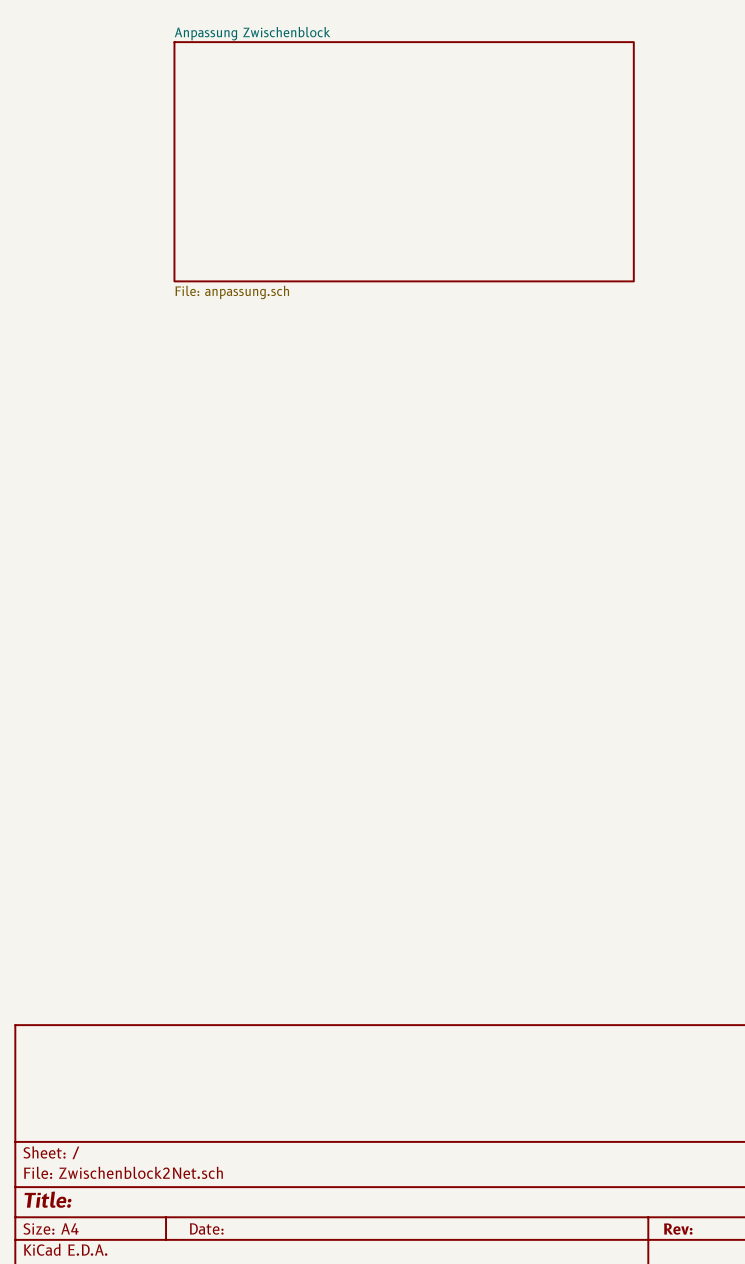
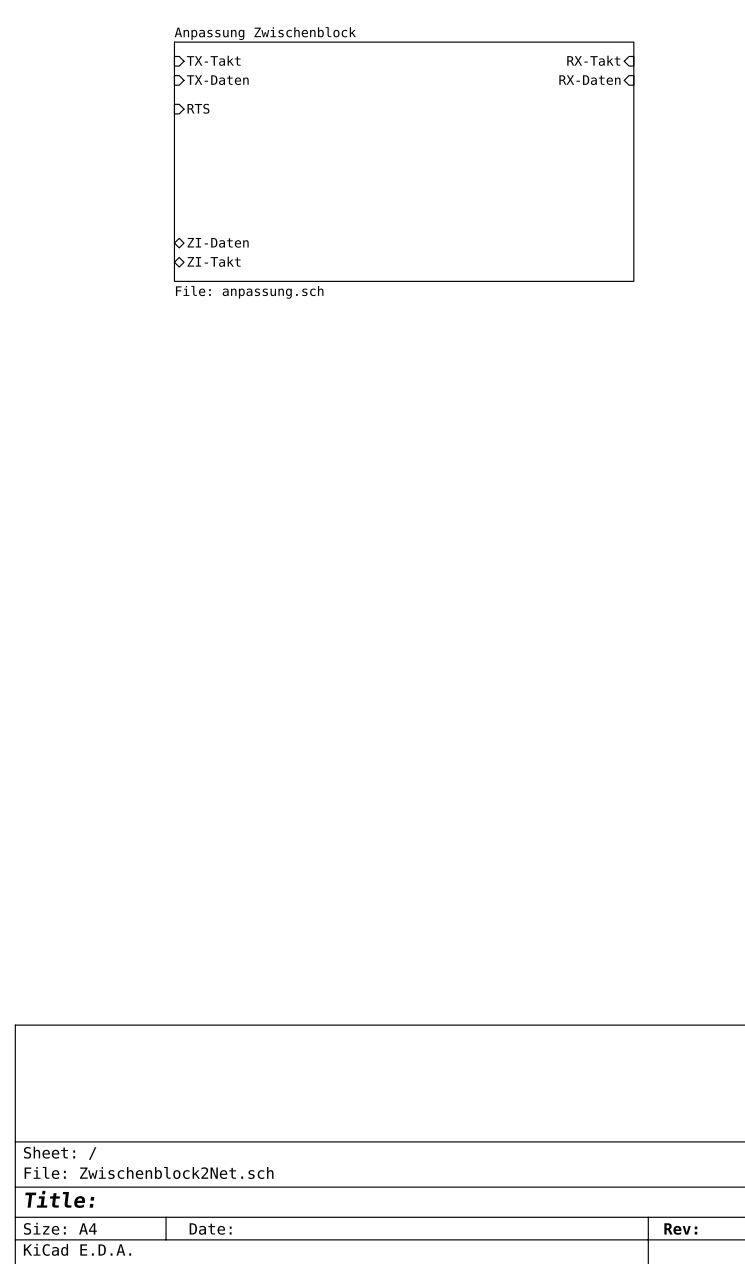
sheet pin: none -> TX-Takt (213, 60)
sheet pin: none -> RX-Takt (593, 60)
sheet pin: none -> TX-Daten (217, 80)
sheet pin: none -> RX-Daten (589, 80)
sheet pin: none -> RTS (198, 108)
sheet pin: none -> ZI-Daten (218, 242)
sheet pin: none -> ZI-Takt (214, 261)

